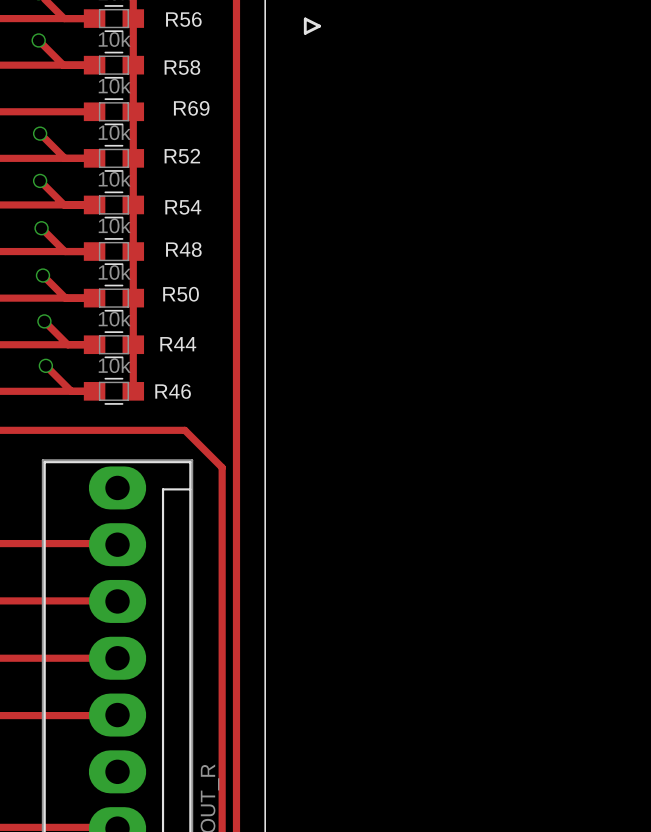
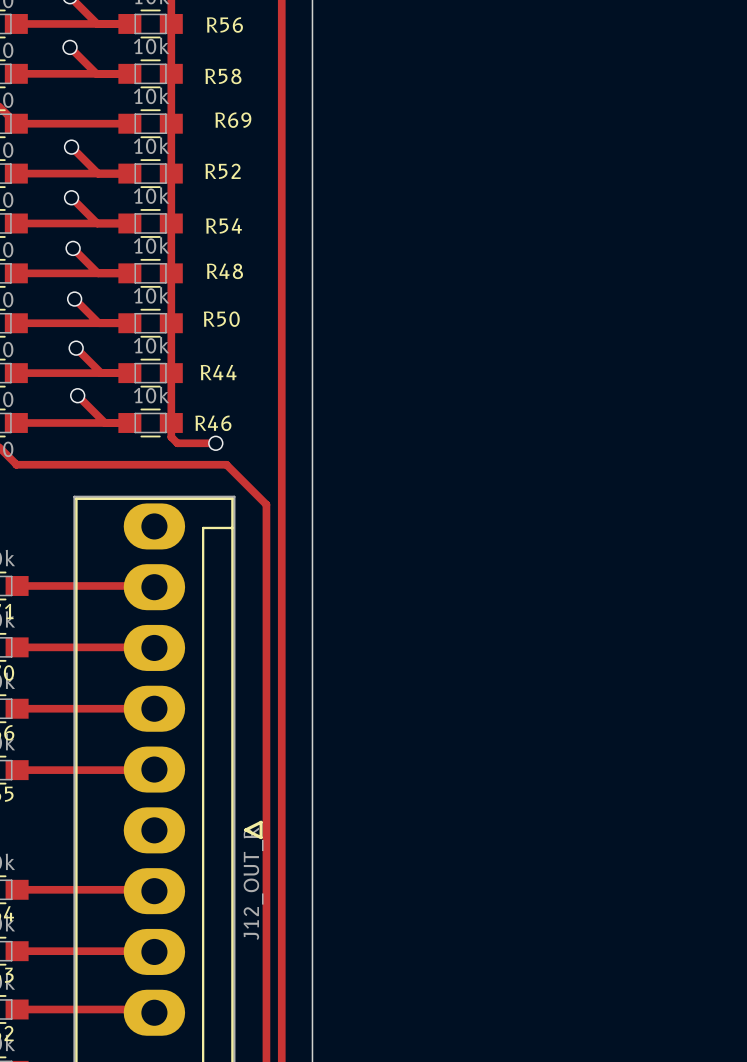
line: (305, 18) (305, 33) (319, 26) (305, 18) -> none
track: none -> (171, 422) (171, 437) (177, 443) (215, 443)
via: none -> (215, 443)
line: none -> (261, 822) (261, 837) (245, 829) (261, 822)

